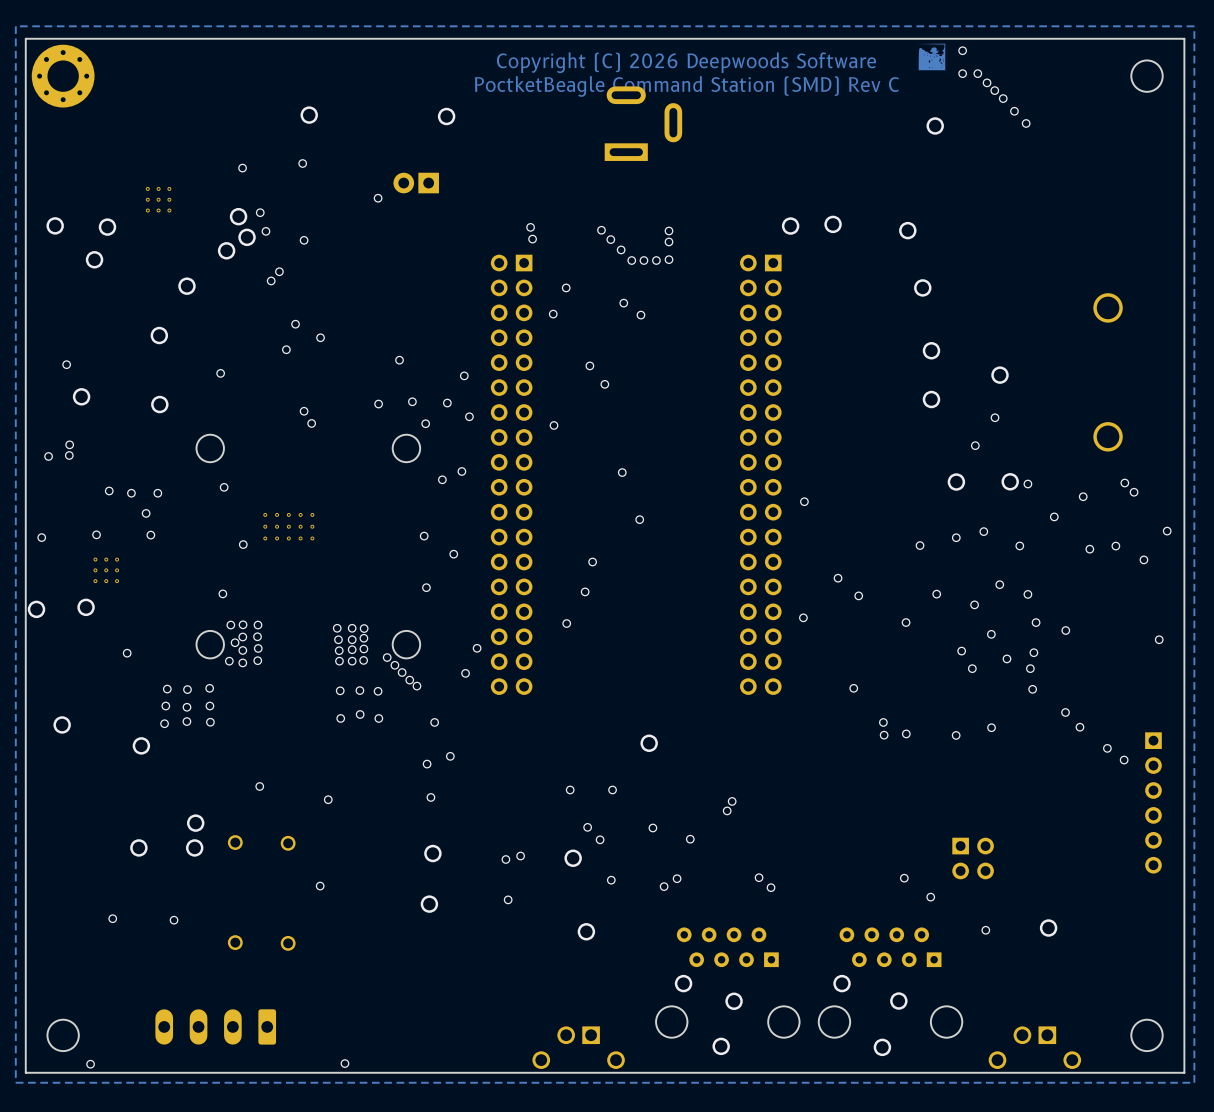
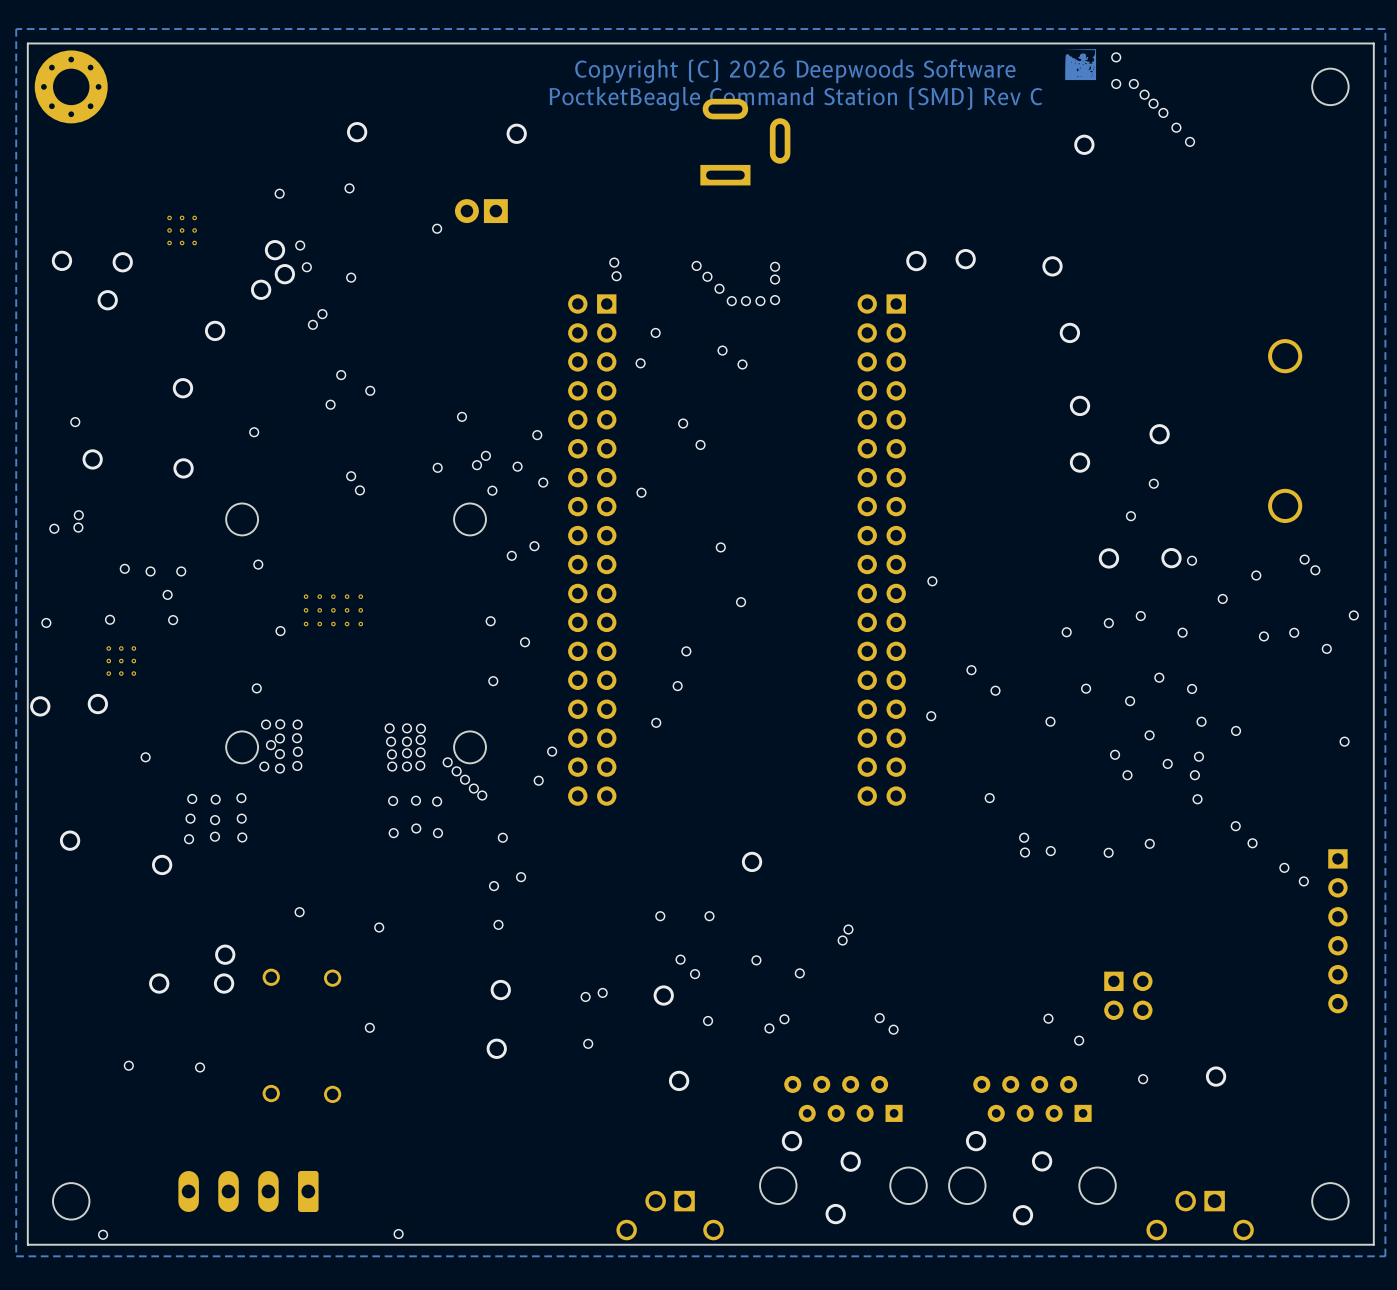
via: none -> (485, 455)

